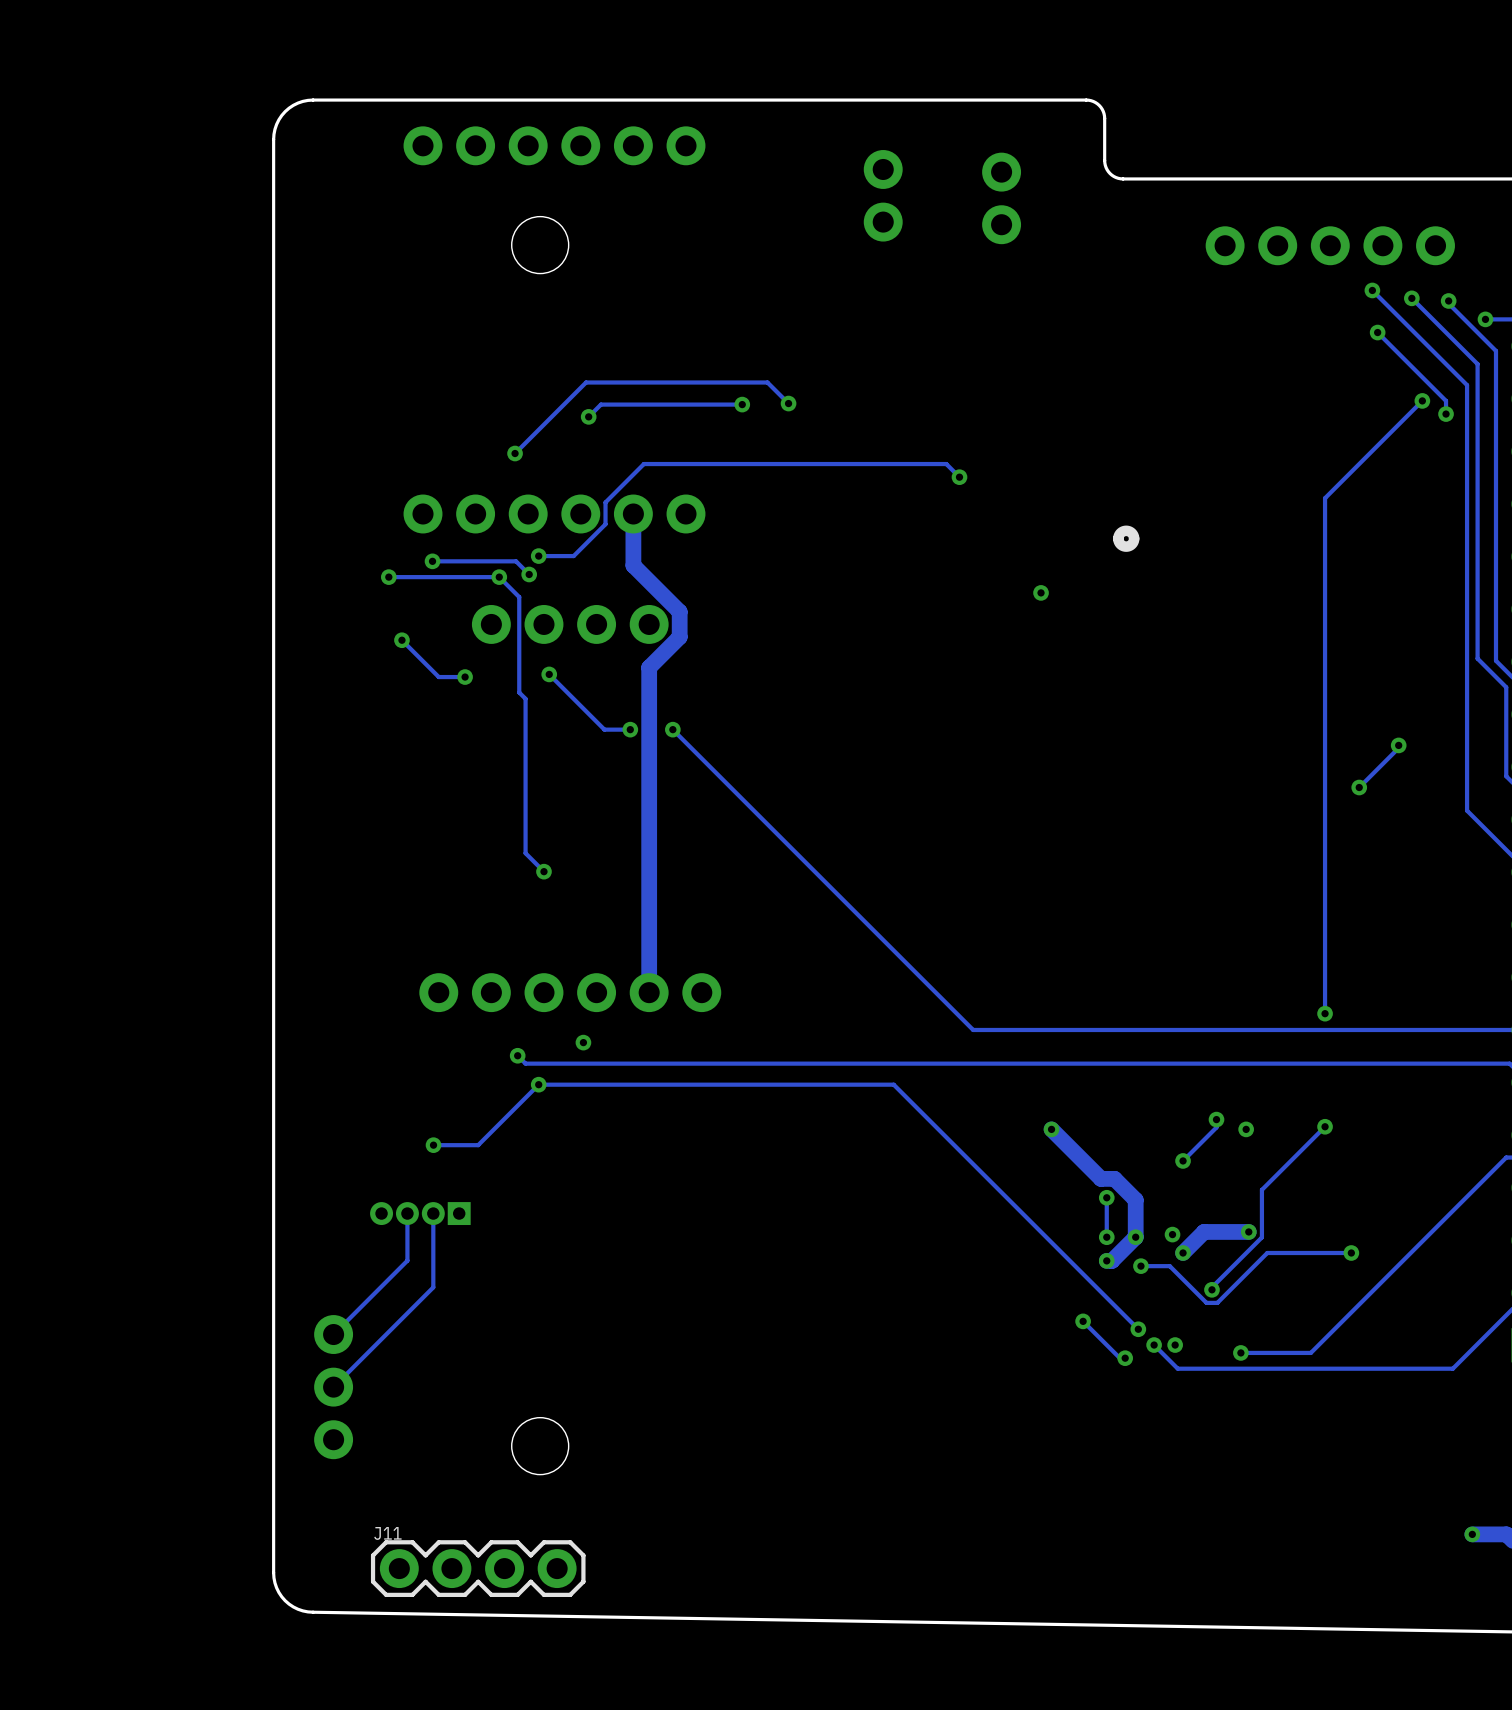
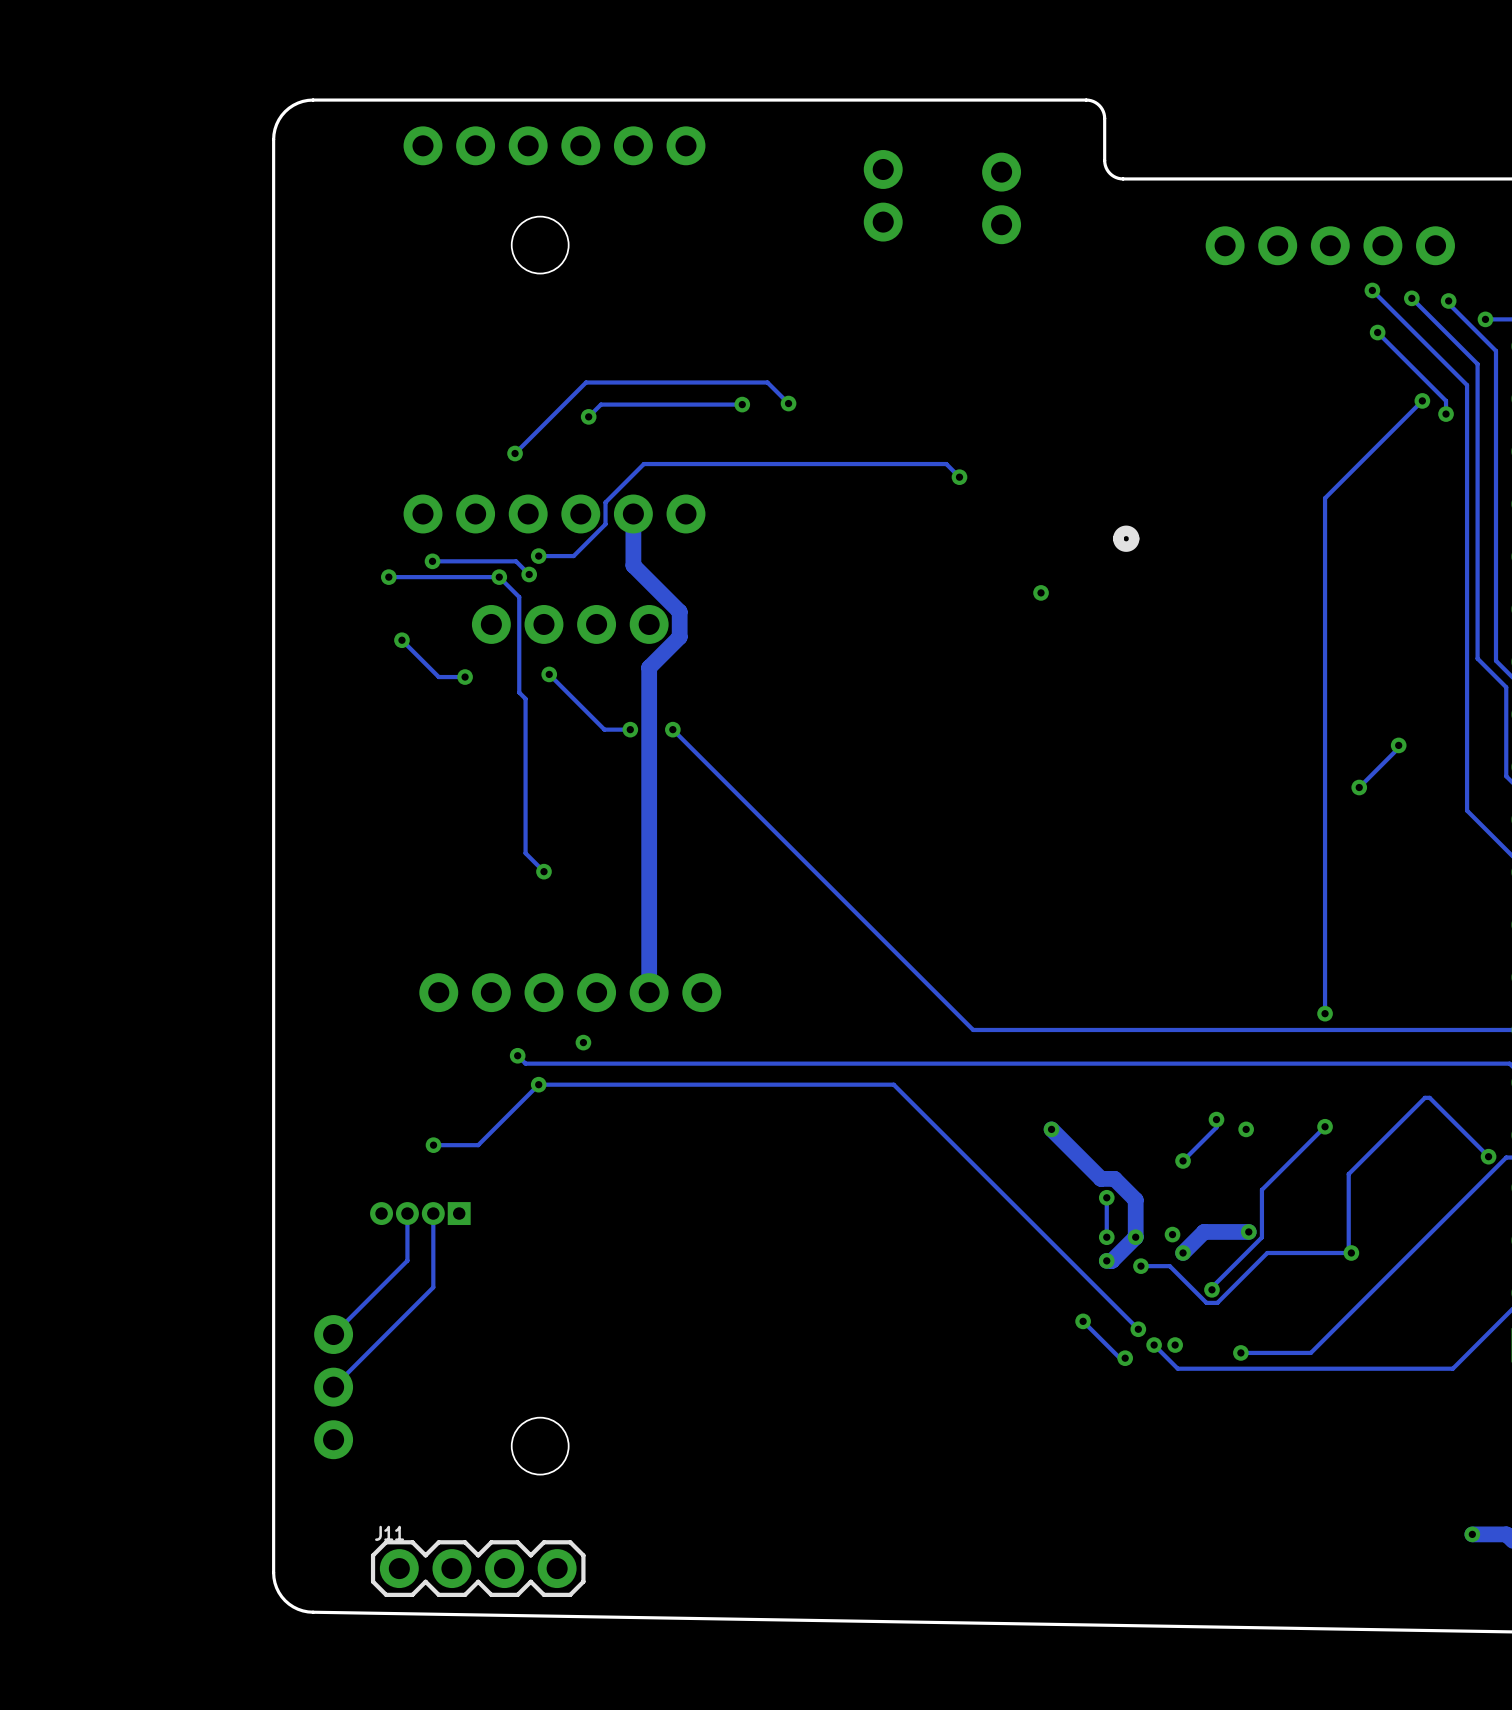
track: none -> (1488, 1156) (1429, 1097) (1424, 1097) (1348, 1174) (1348, 1252)
via: none -> (1488, 1156)

